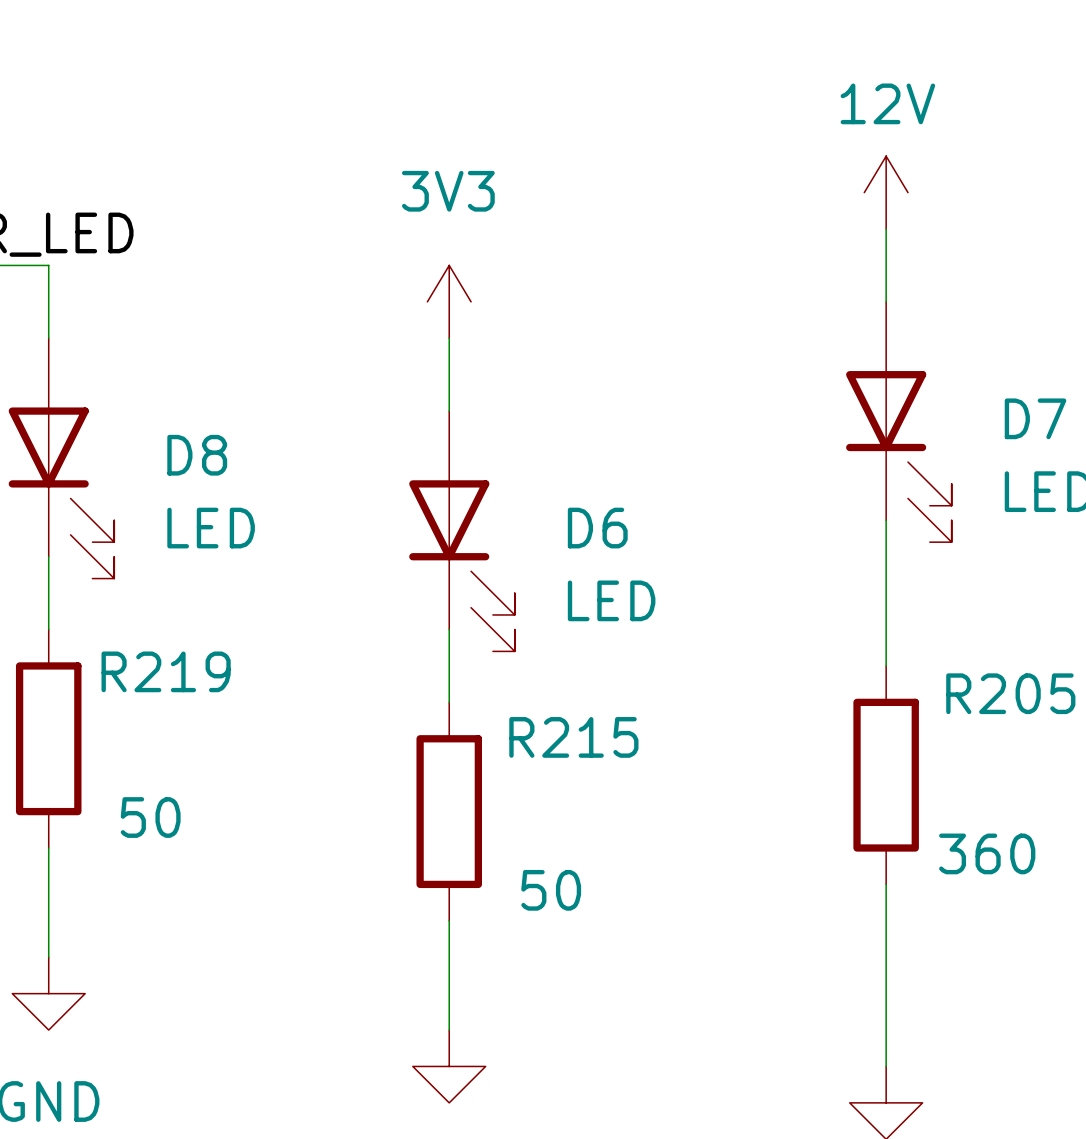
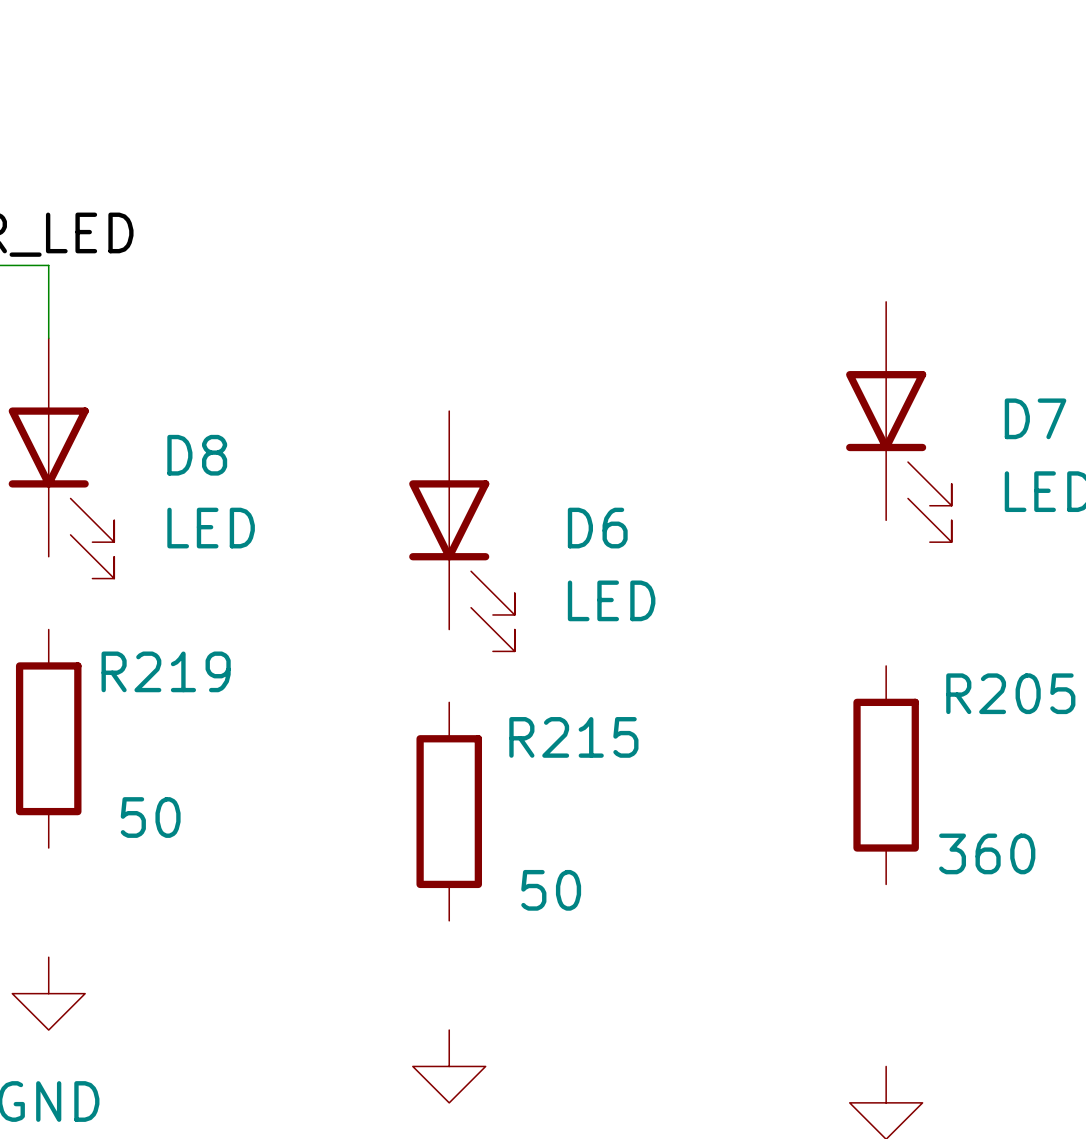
power symbol: 12V (886, 192) -> none
wire: (886, 229) (886, 301) -> none
power symbol: 3V3 (449, 301) -> none
wire: (449, 338) (449, 411) -> none
wire: (886, 520) (886, 665) -> none
wire: (48, 556) (48, 629) -> none
wire: (449, 629) (449, 702) -> none
wire: (48, 848) (48, 957) -> none
wire: (886, 884) (886, 1066) -> none
wire: (449, 920) (449, 1030) -> none

